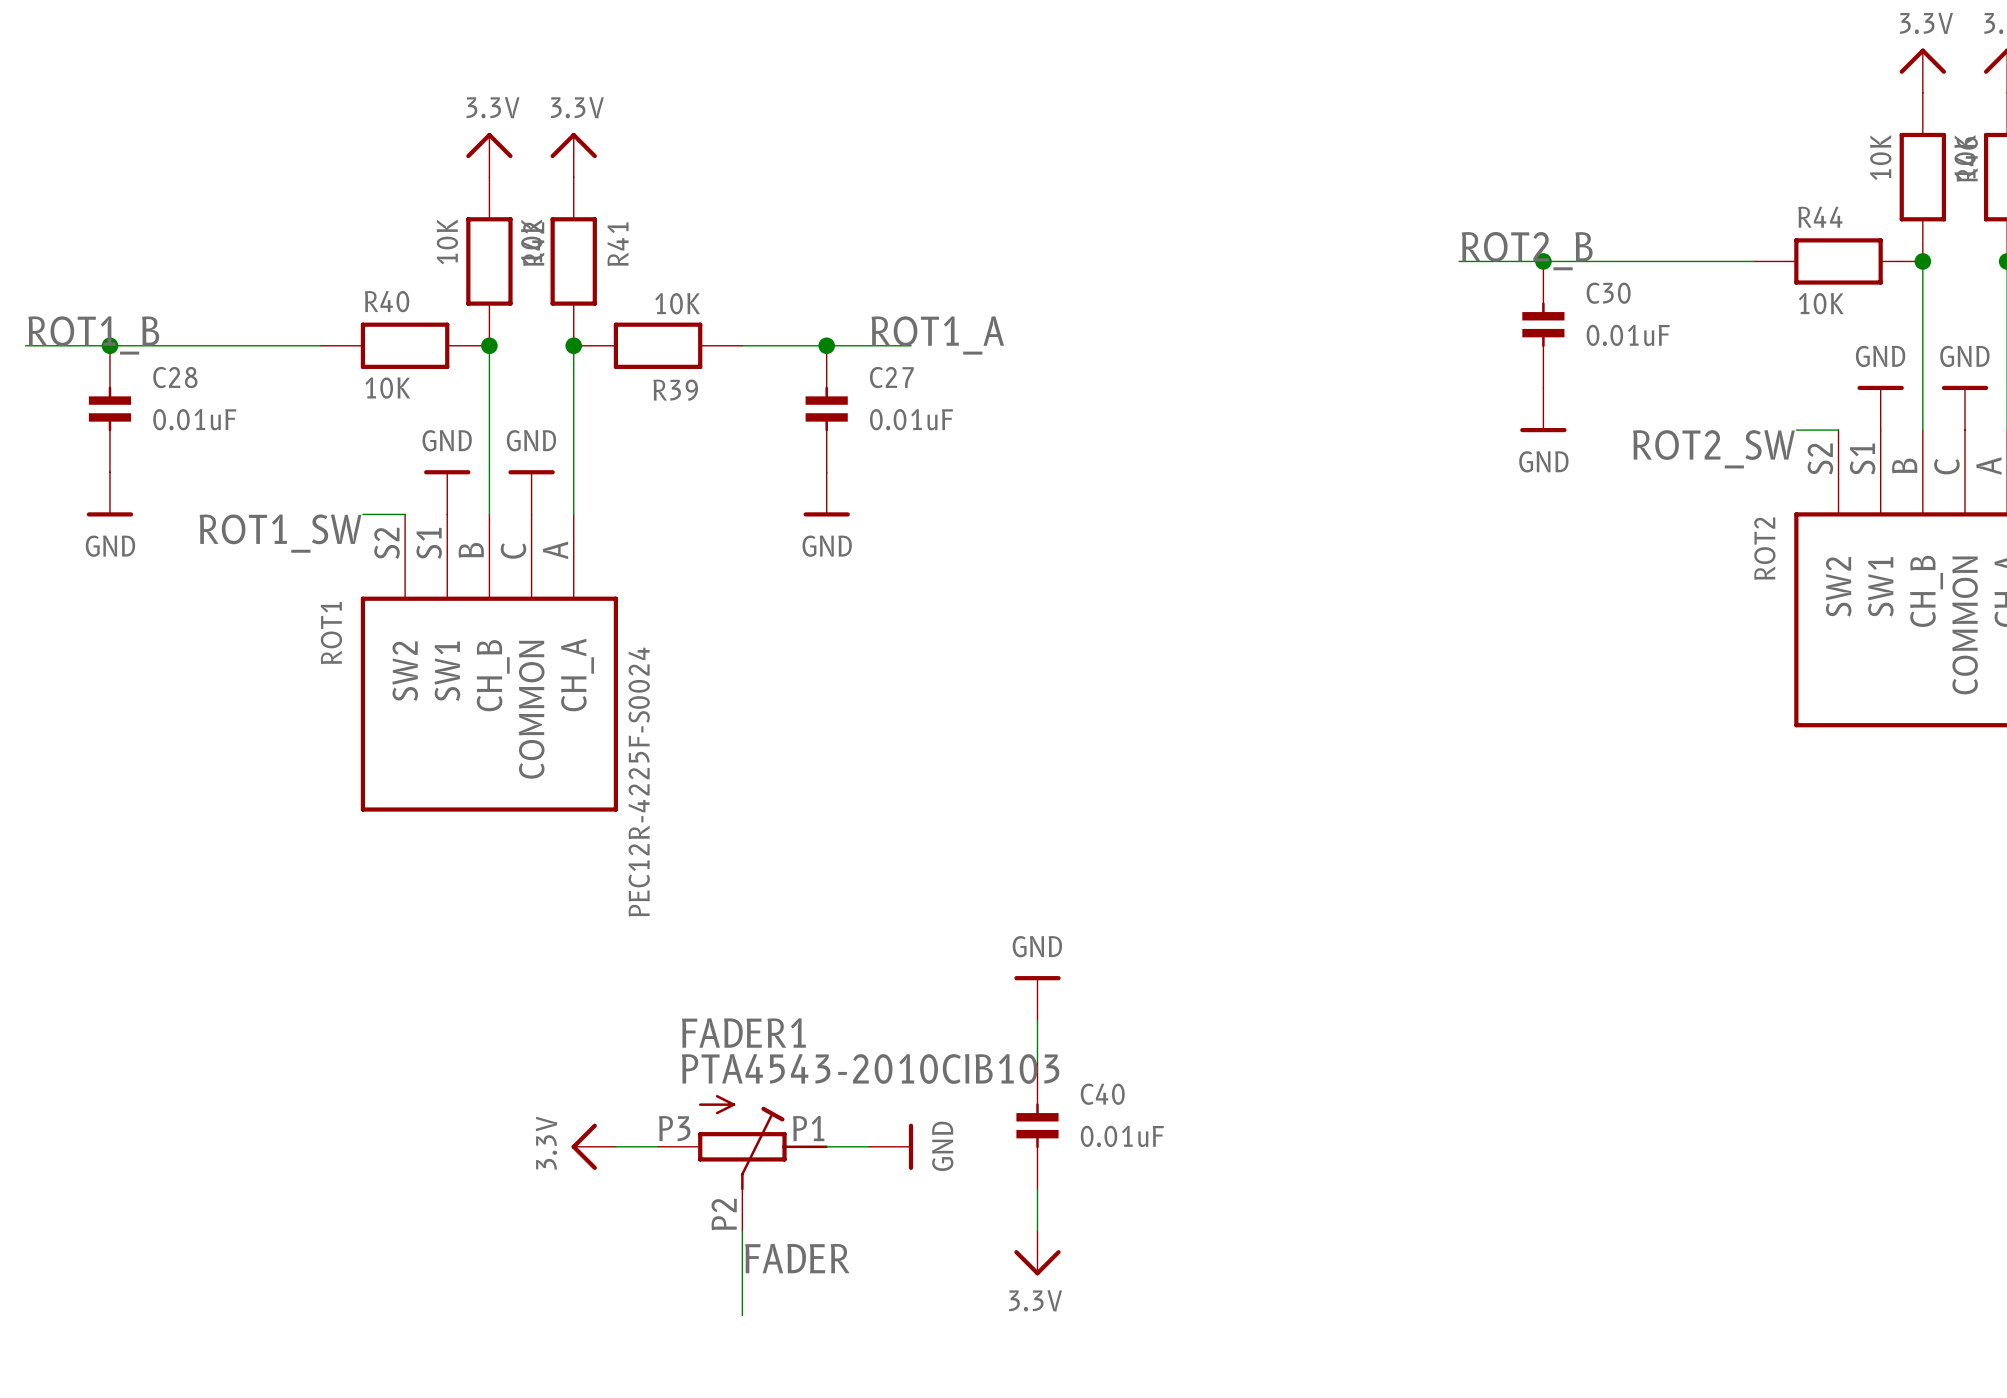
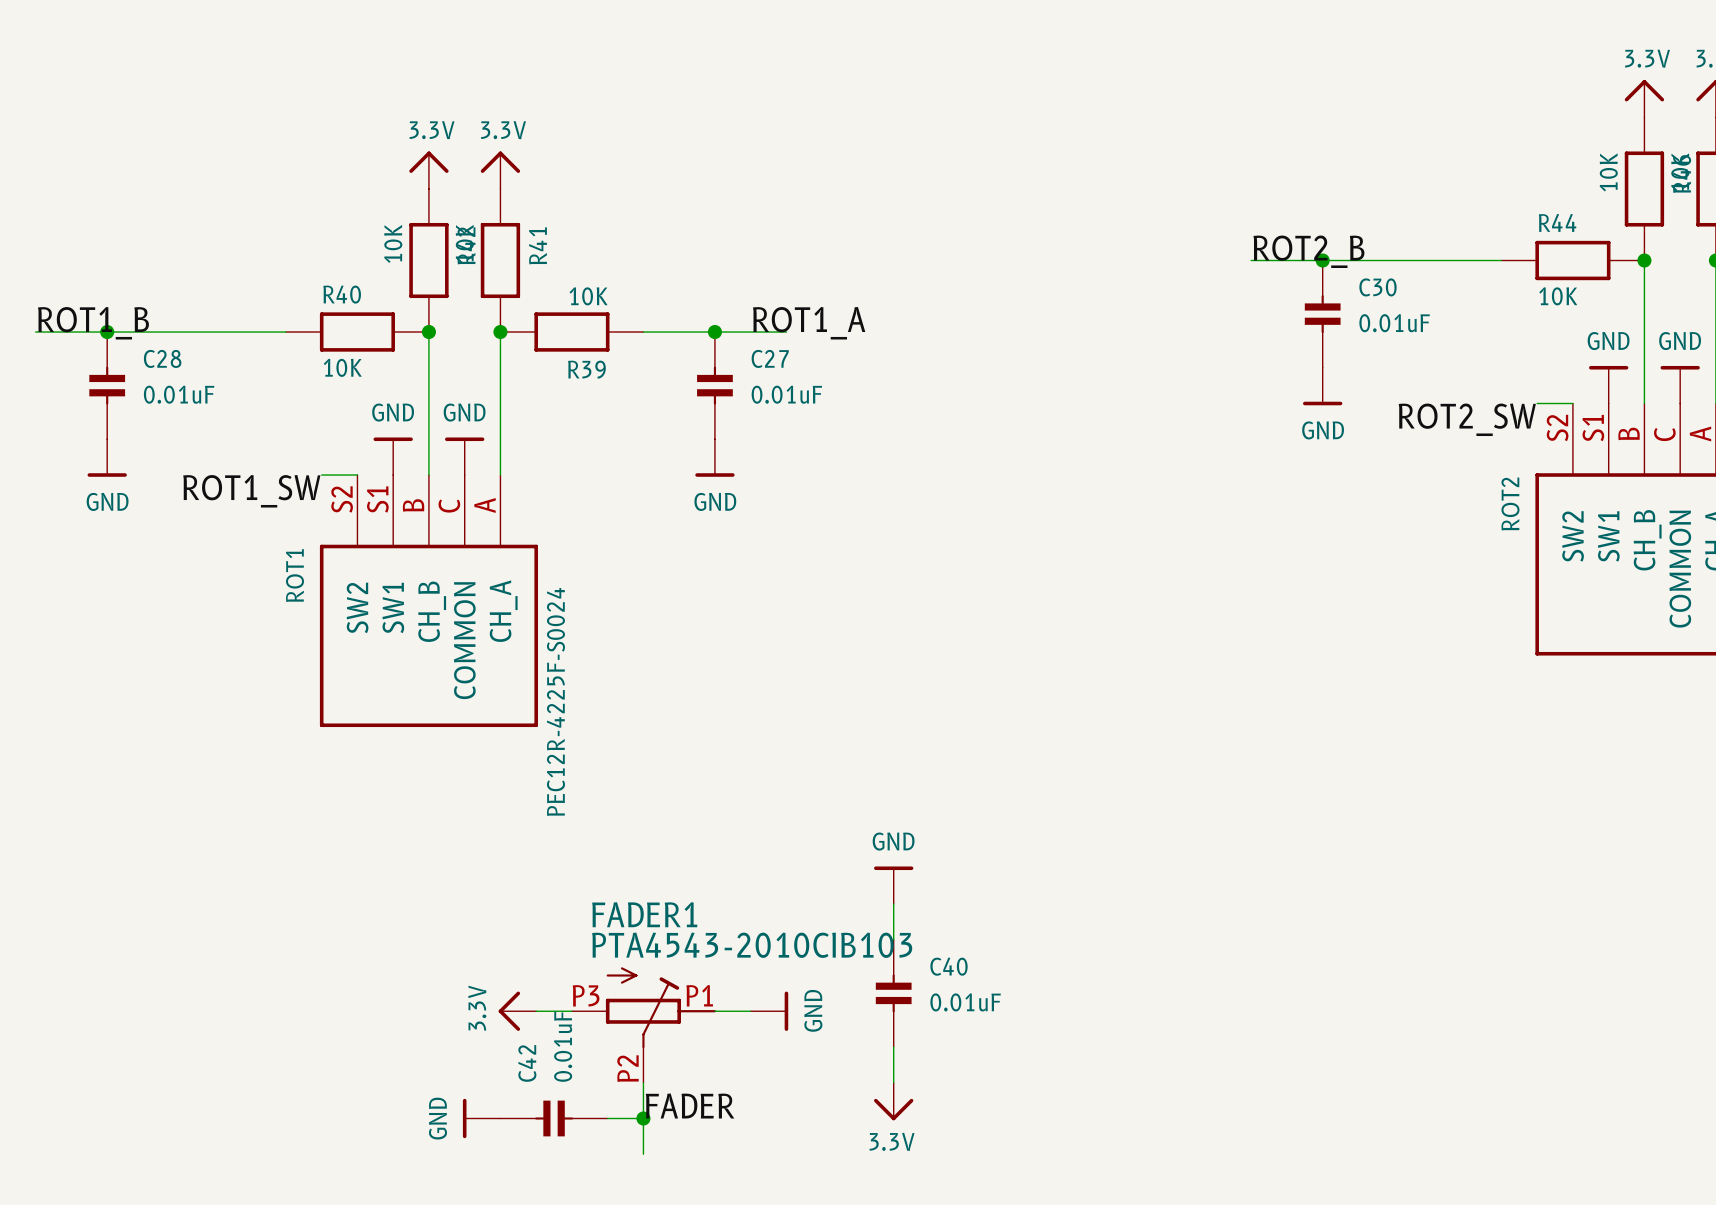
power symbol: none -> GND (481, 1118)
C42: none -> 0.01uF (554, 1118)
wire: none -> (607, 1118) (643, 1118)
junction: none -> (643, 1118)

